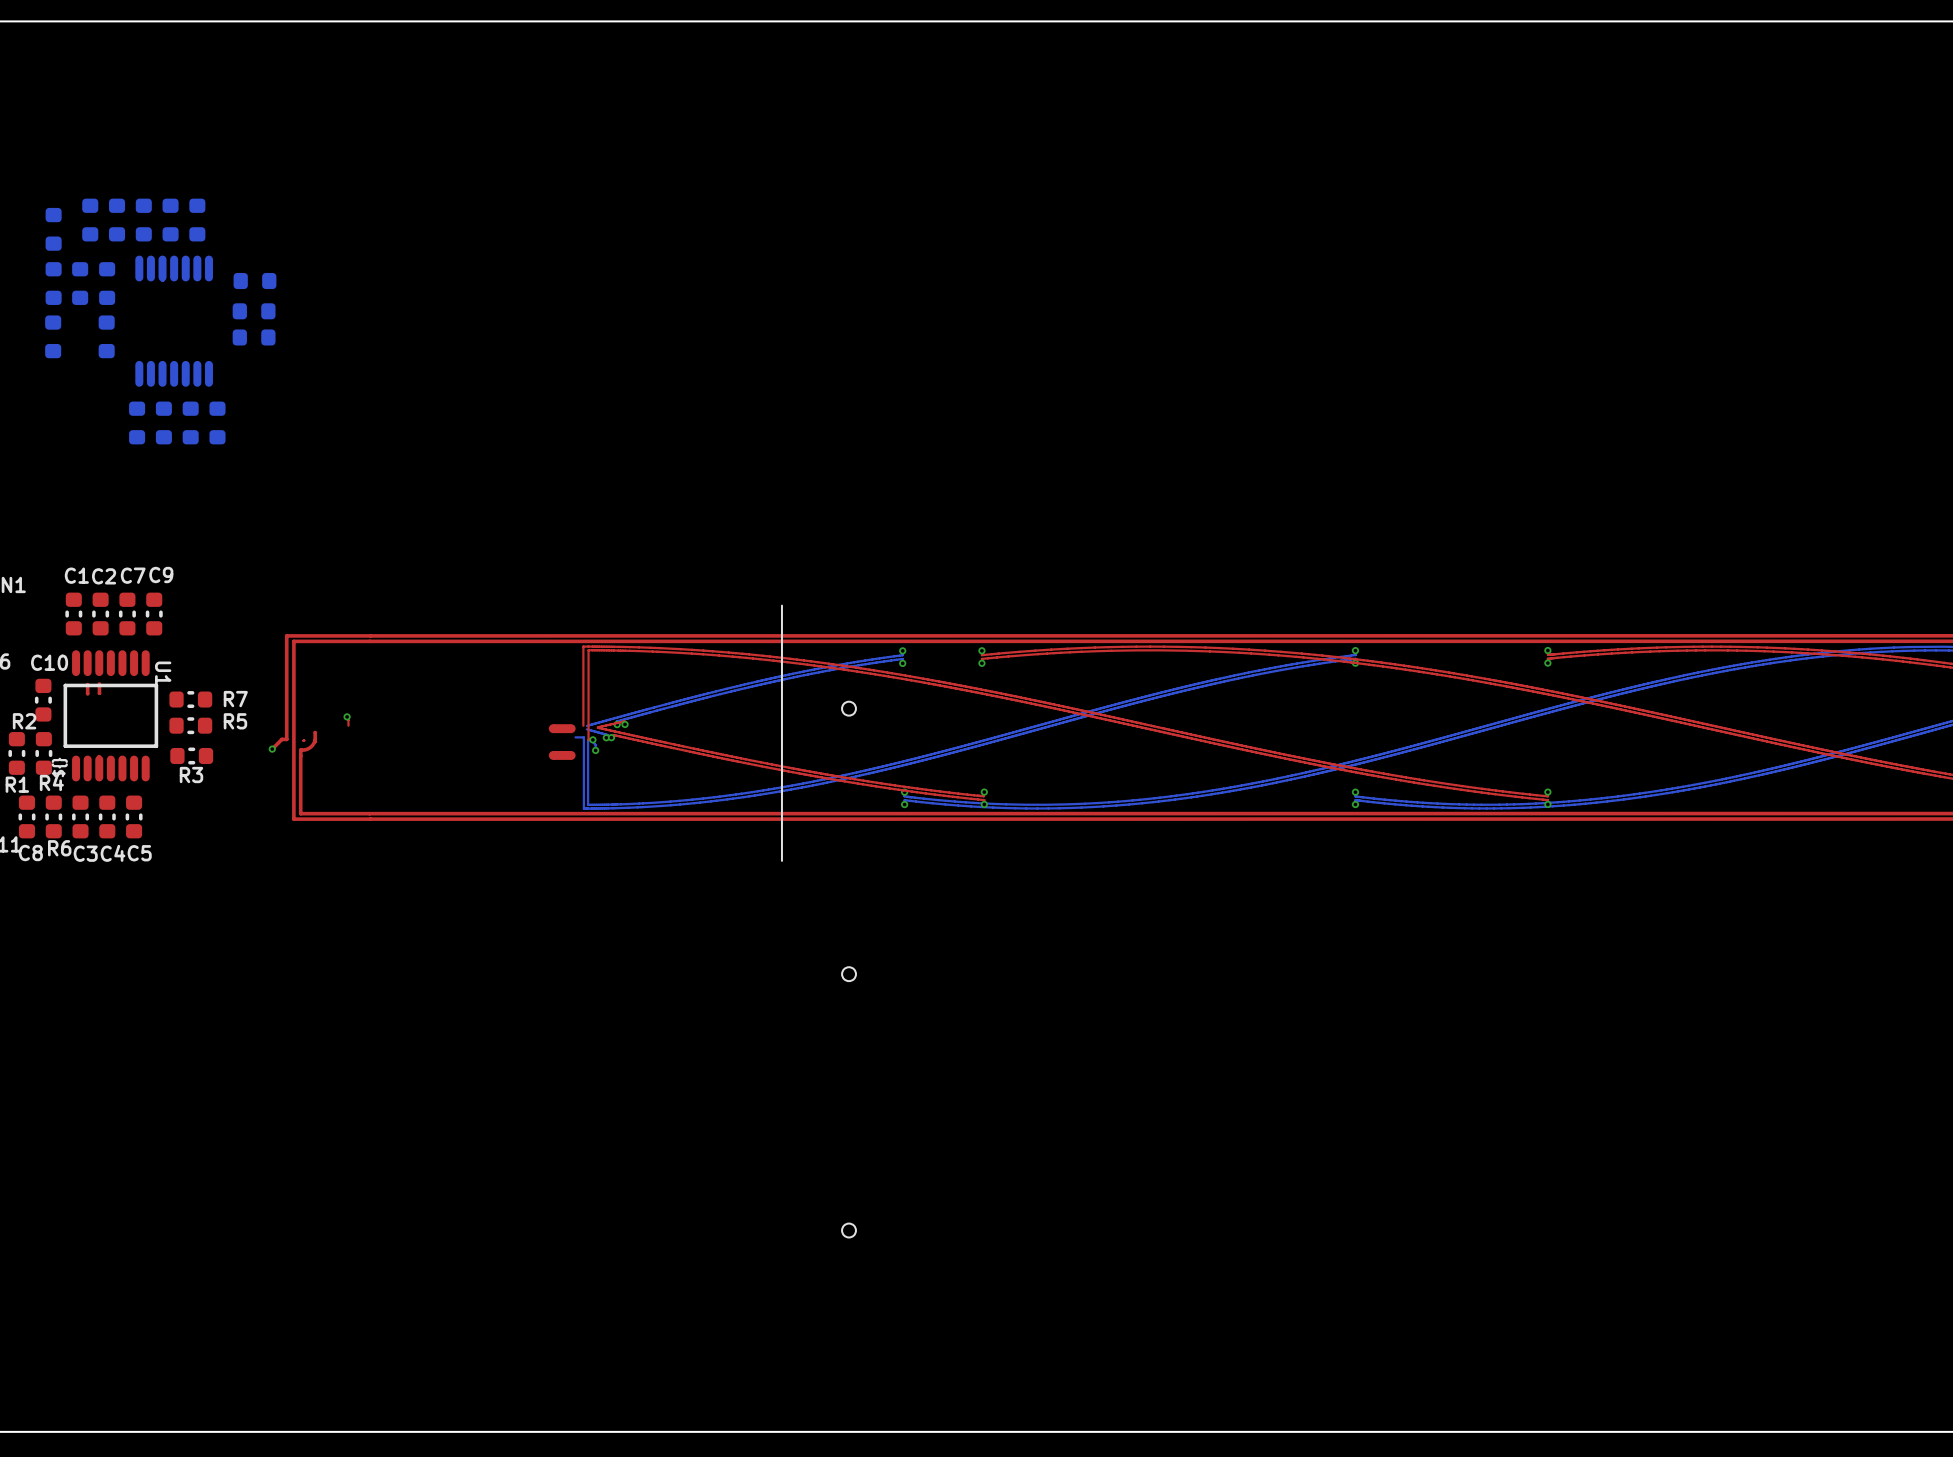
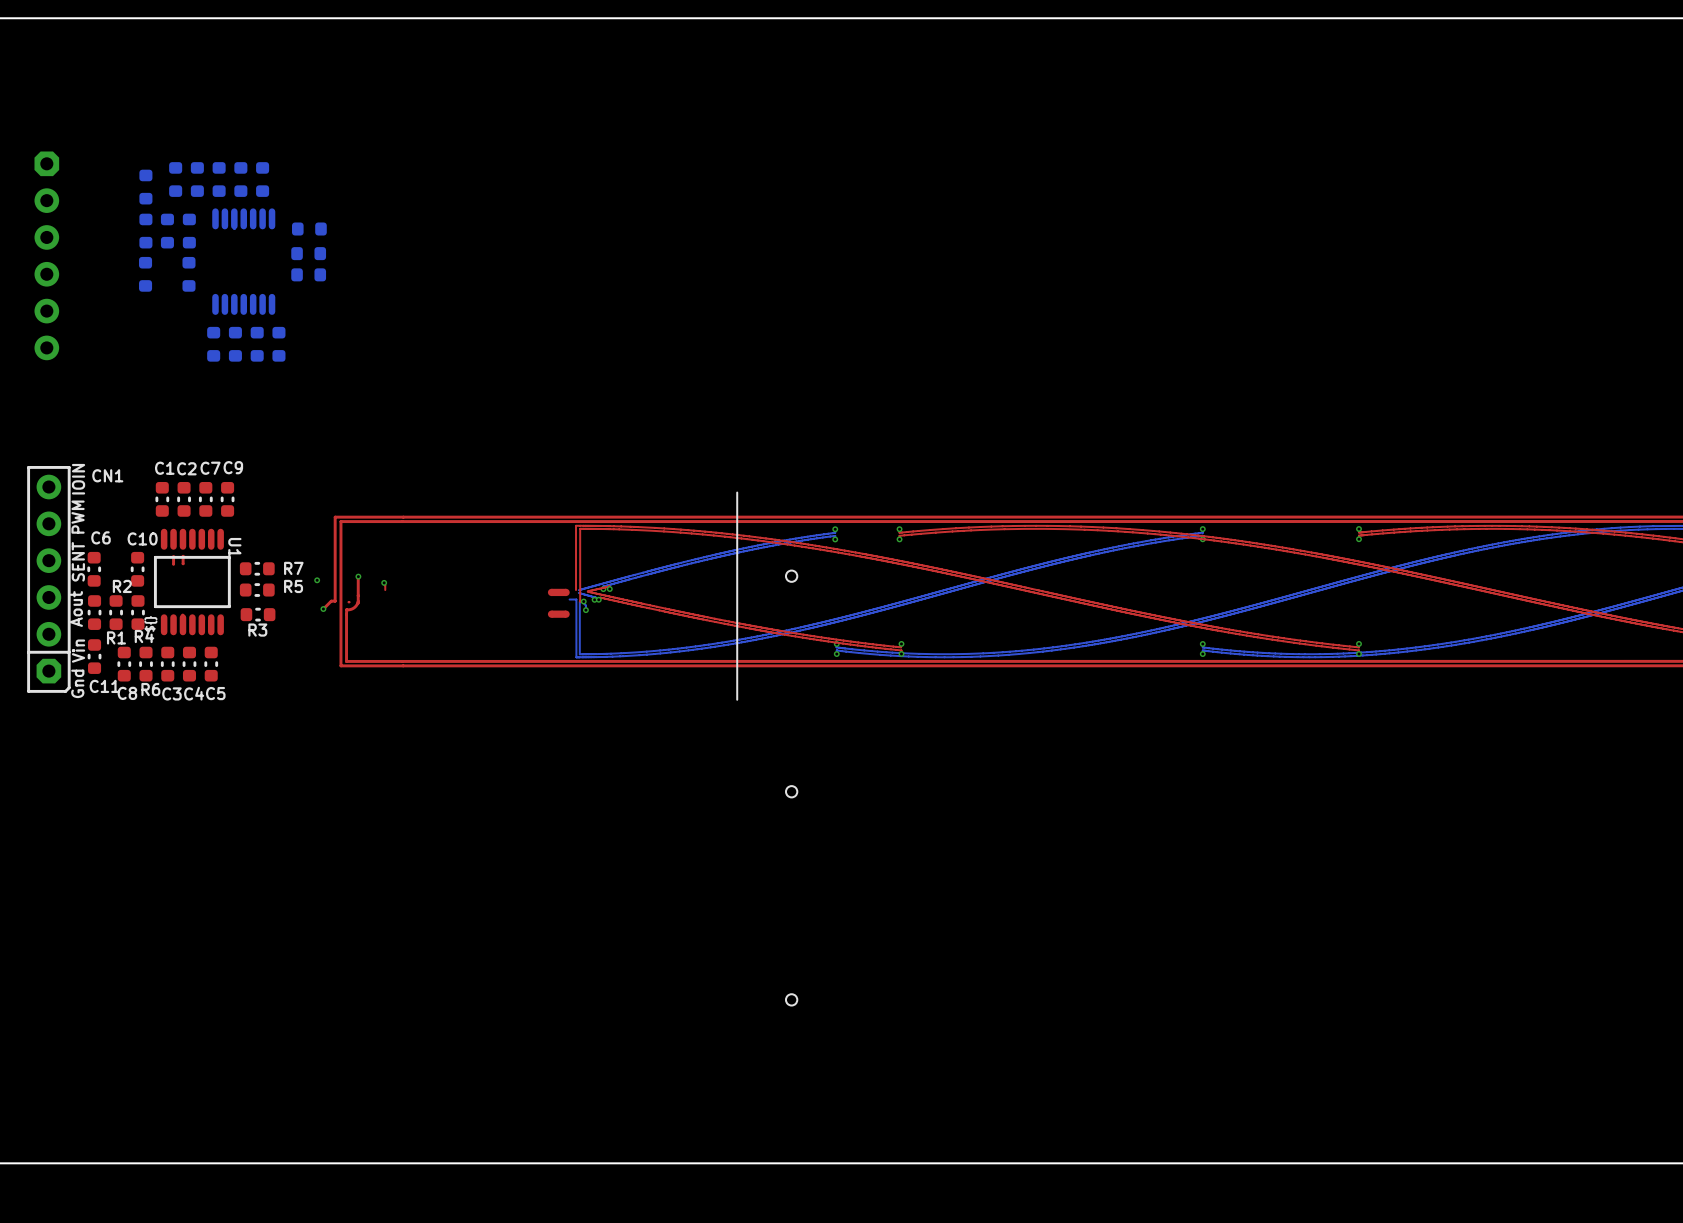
top track: none -> (358, 576) (358, 595)
via: none -> (358, 576)
via: none -> (317, 580)

